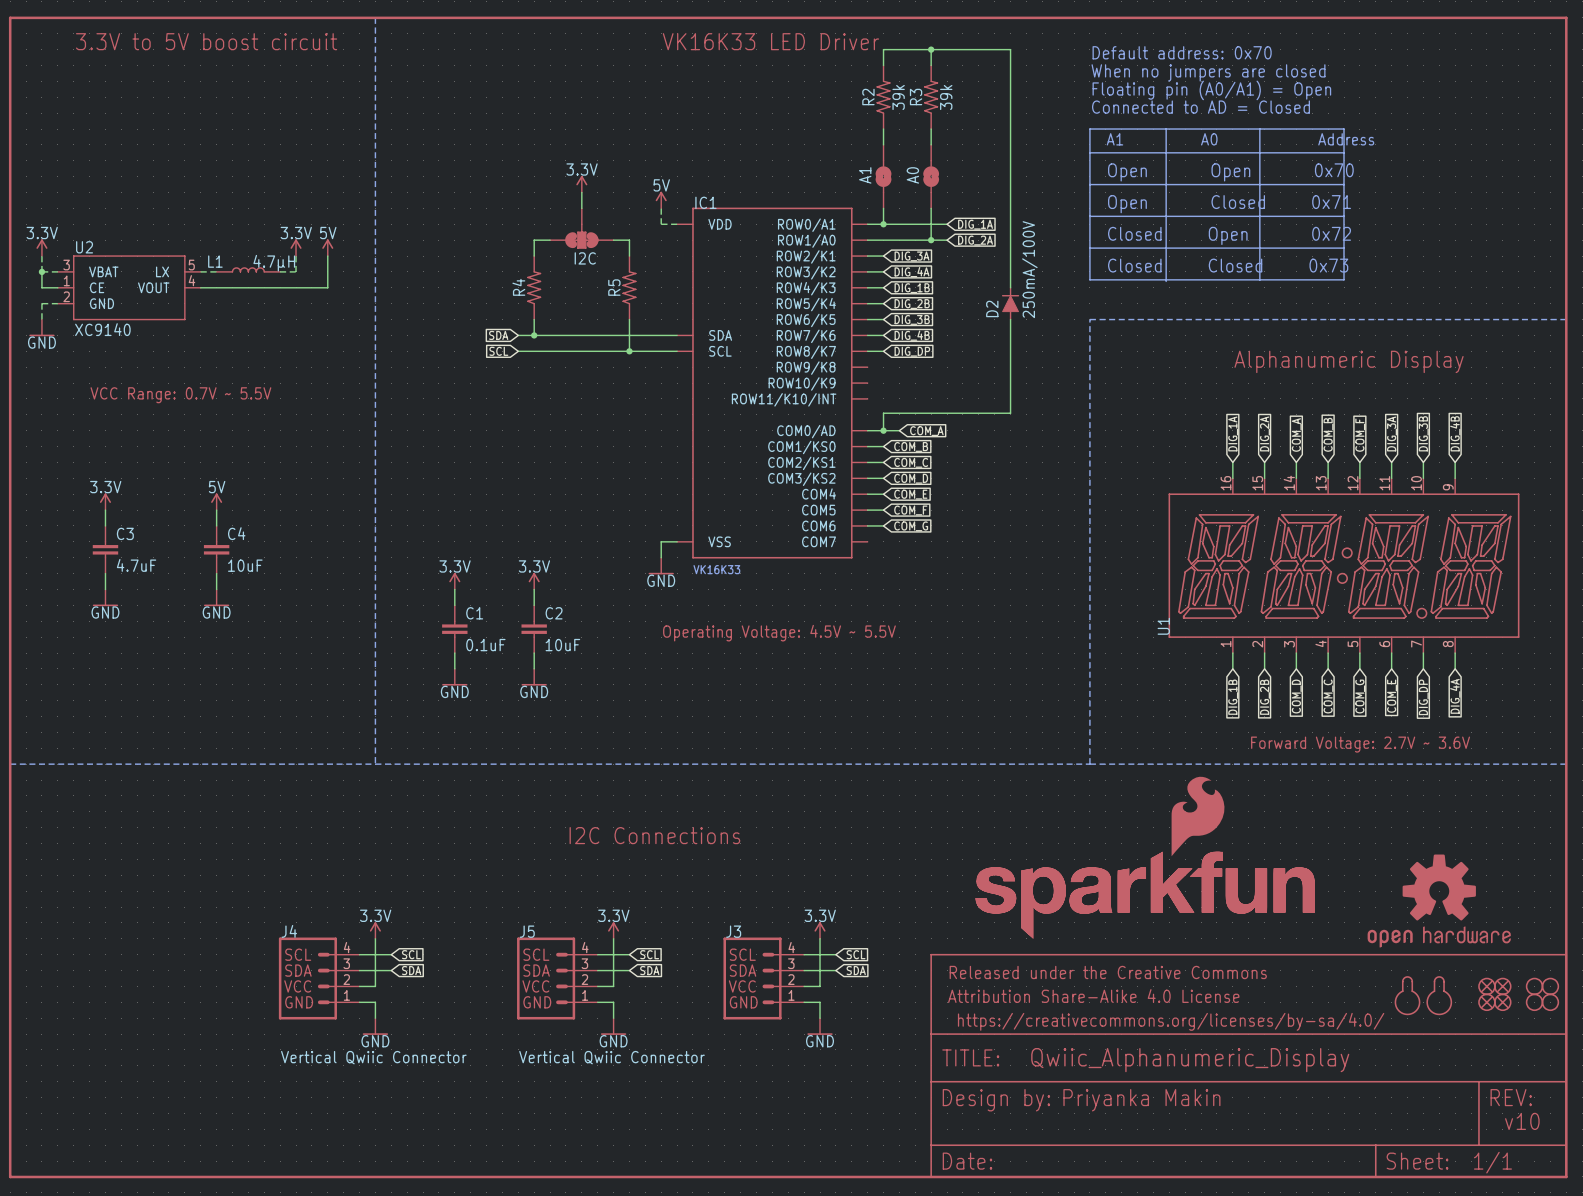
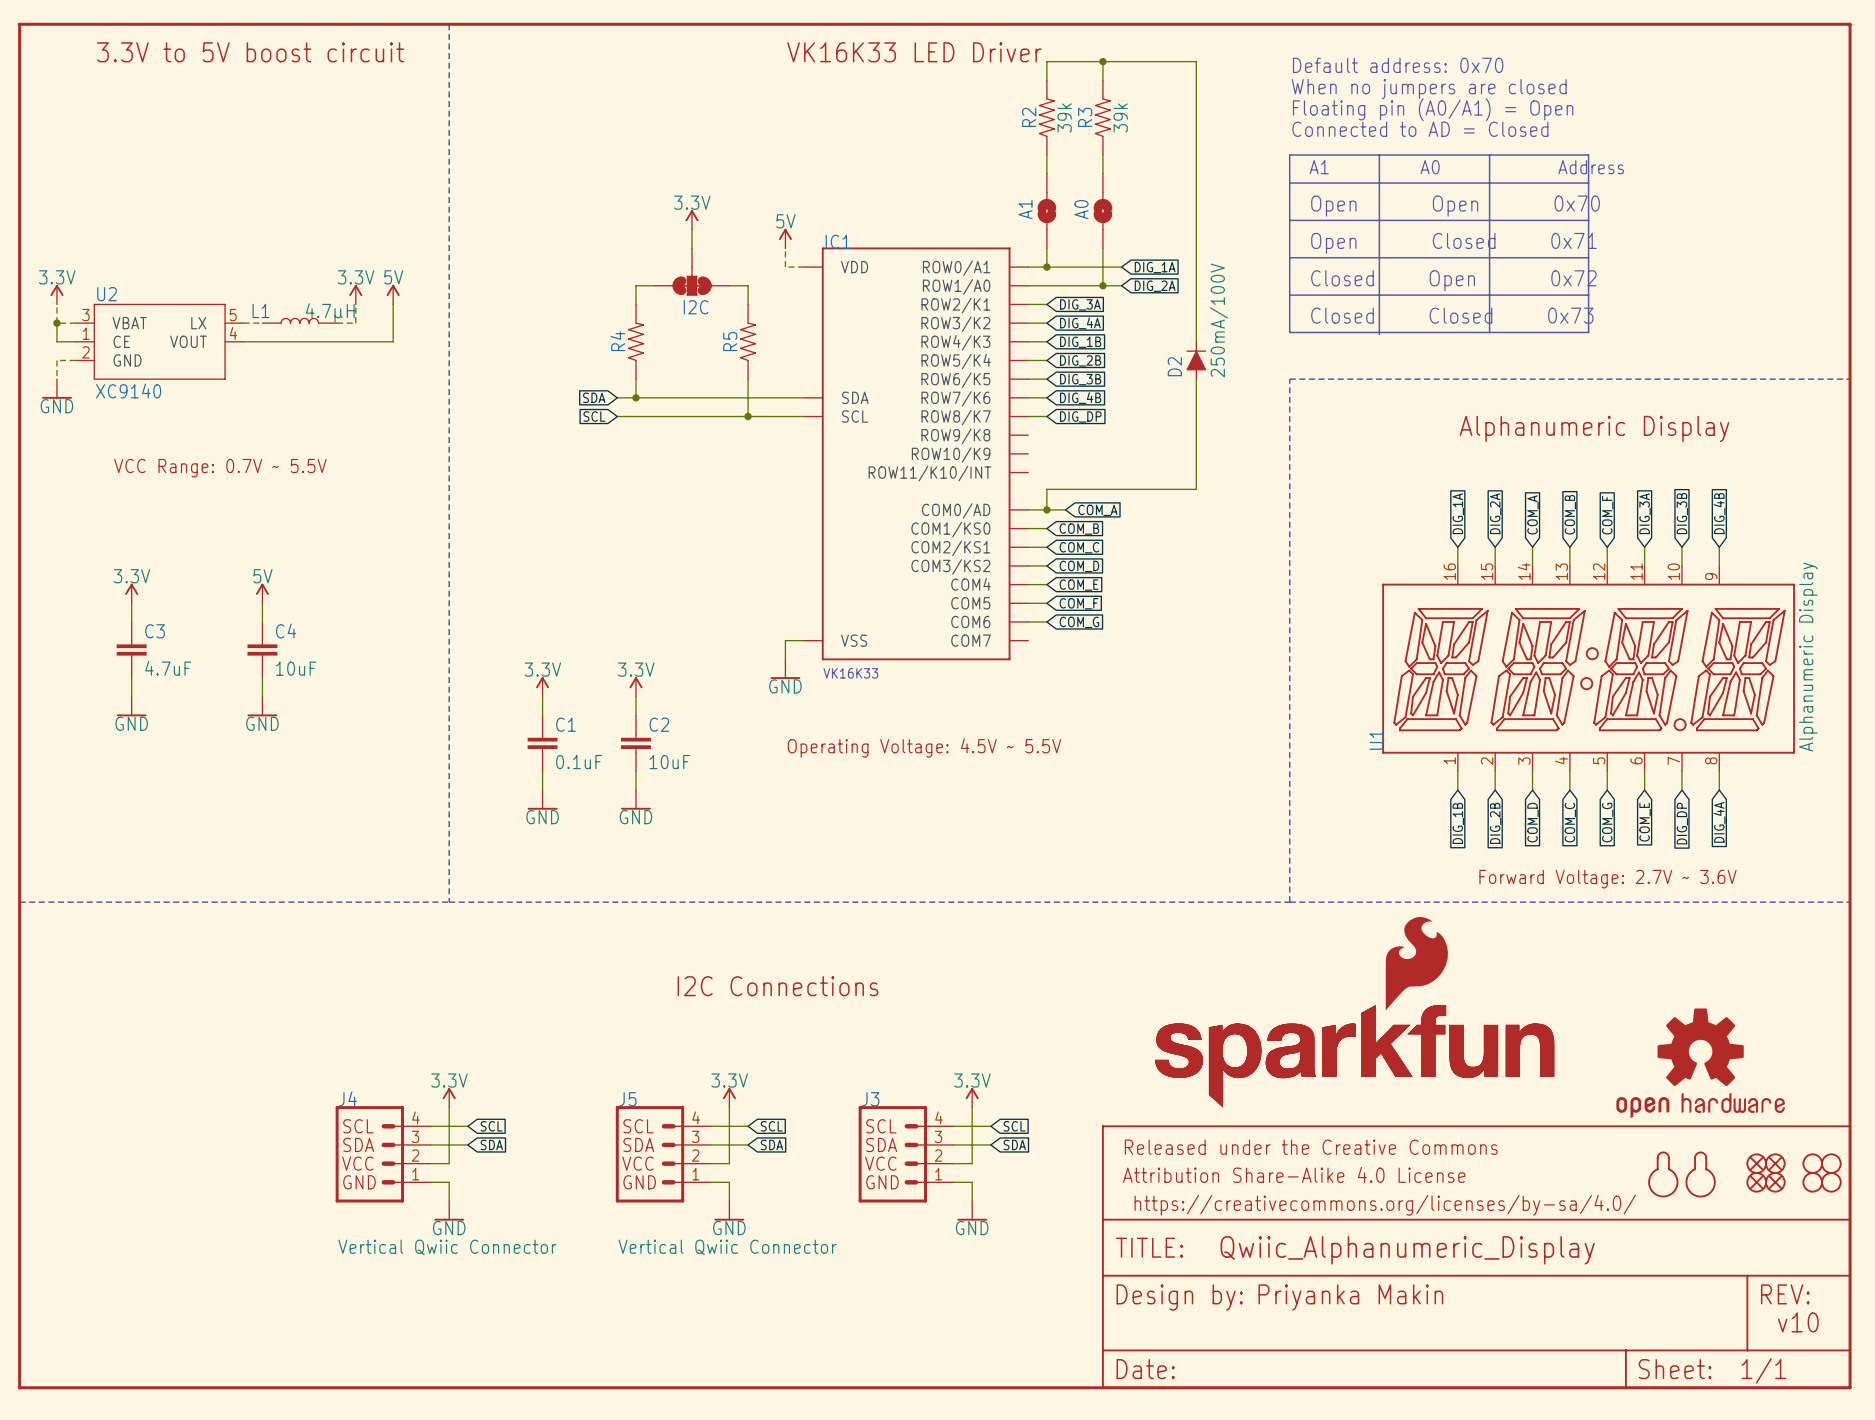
U1 value: none -> Alphanumeric Display (1808, 657)

